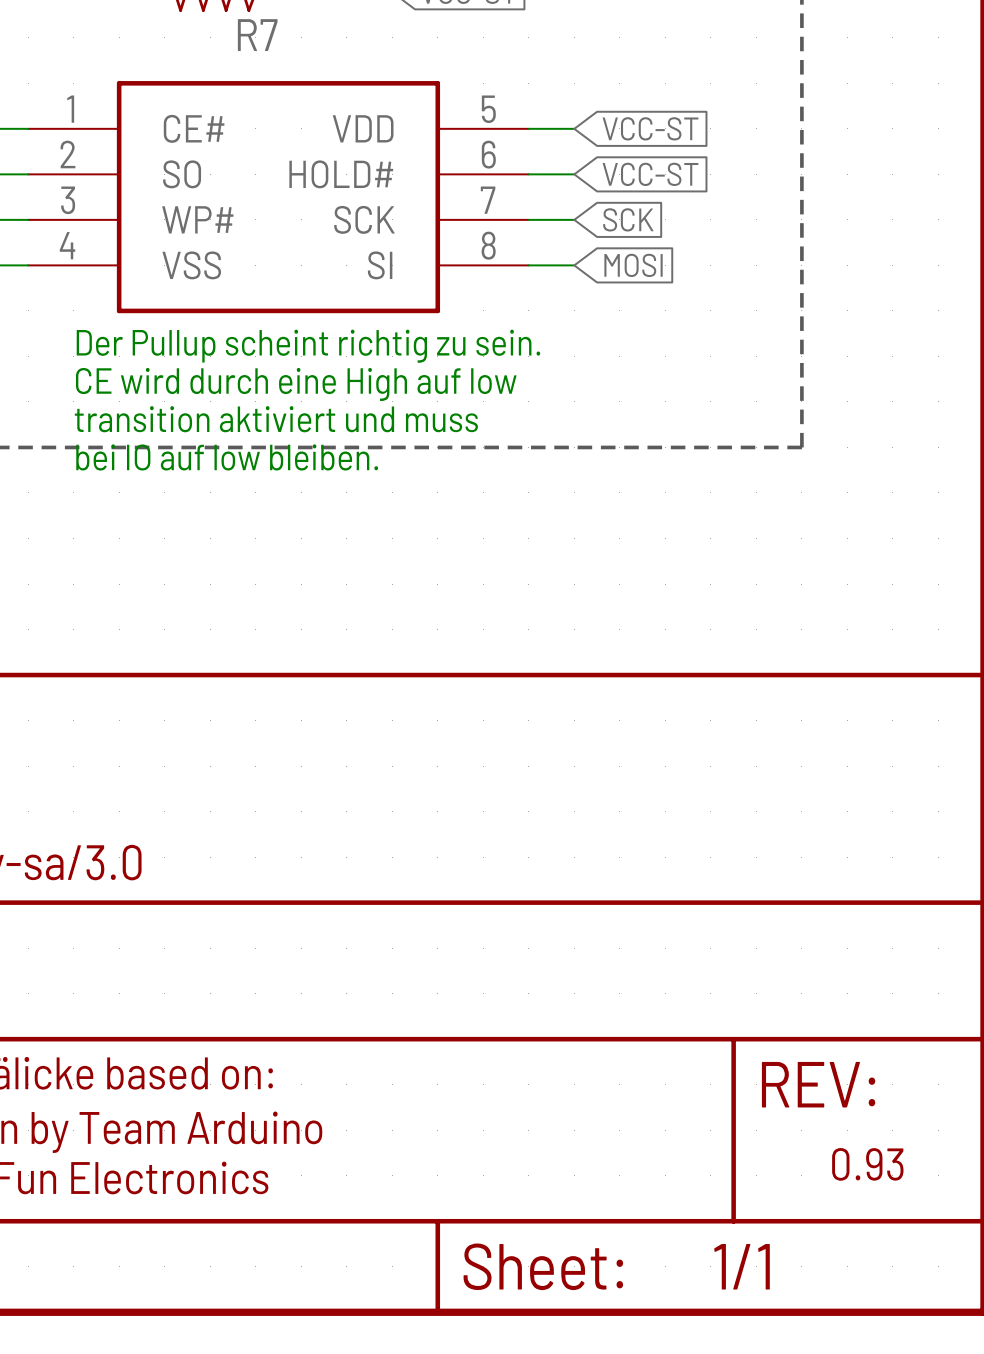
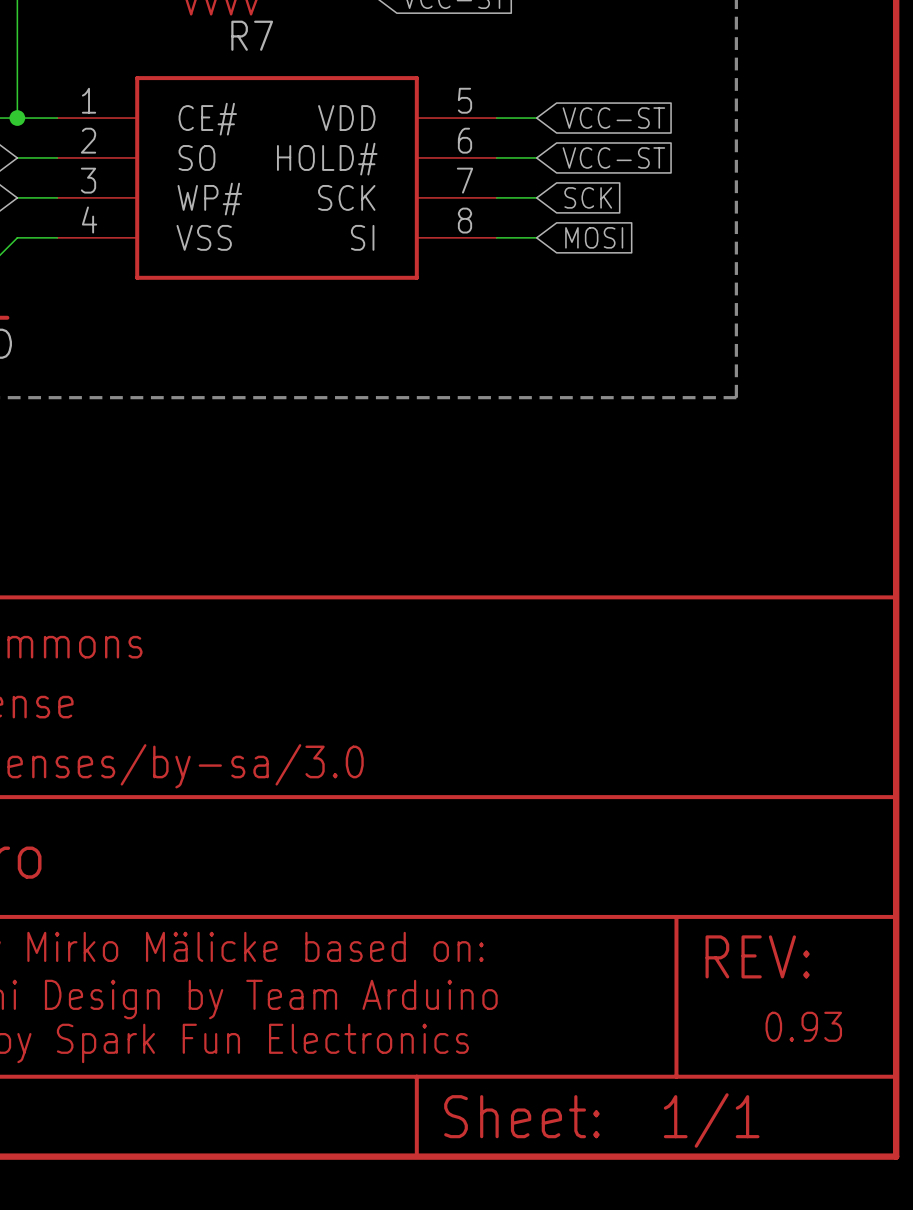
text: Der Pullup scheint richtig zu sein. (308, 346) -> none
text: CE wird durch eine High auf low (296, 384) -> none
text: transition aktiviert und muss (276, 419) -> none
text: bei IO auf low bleiben. (227, 457) -> none

